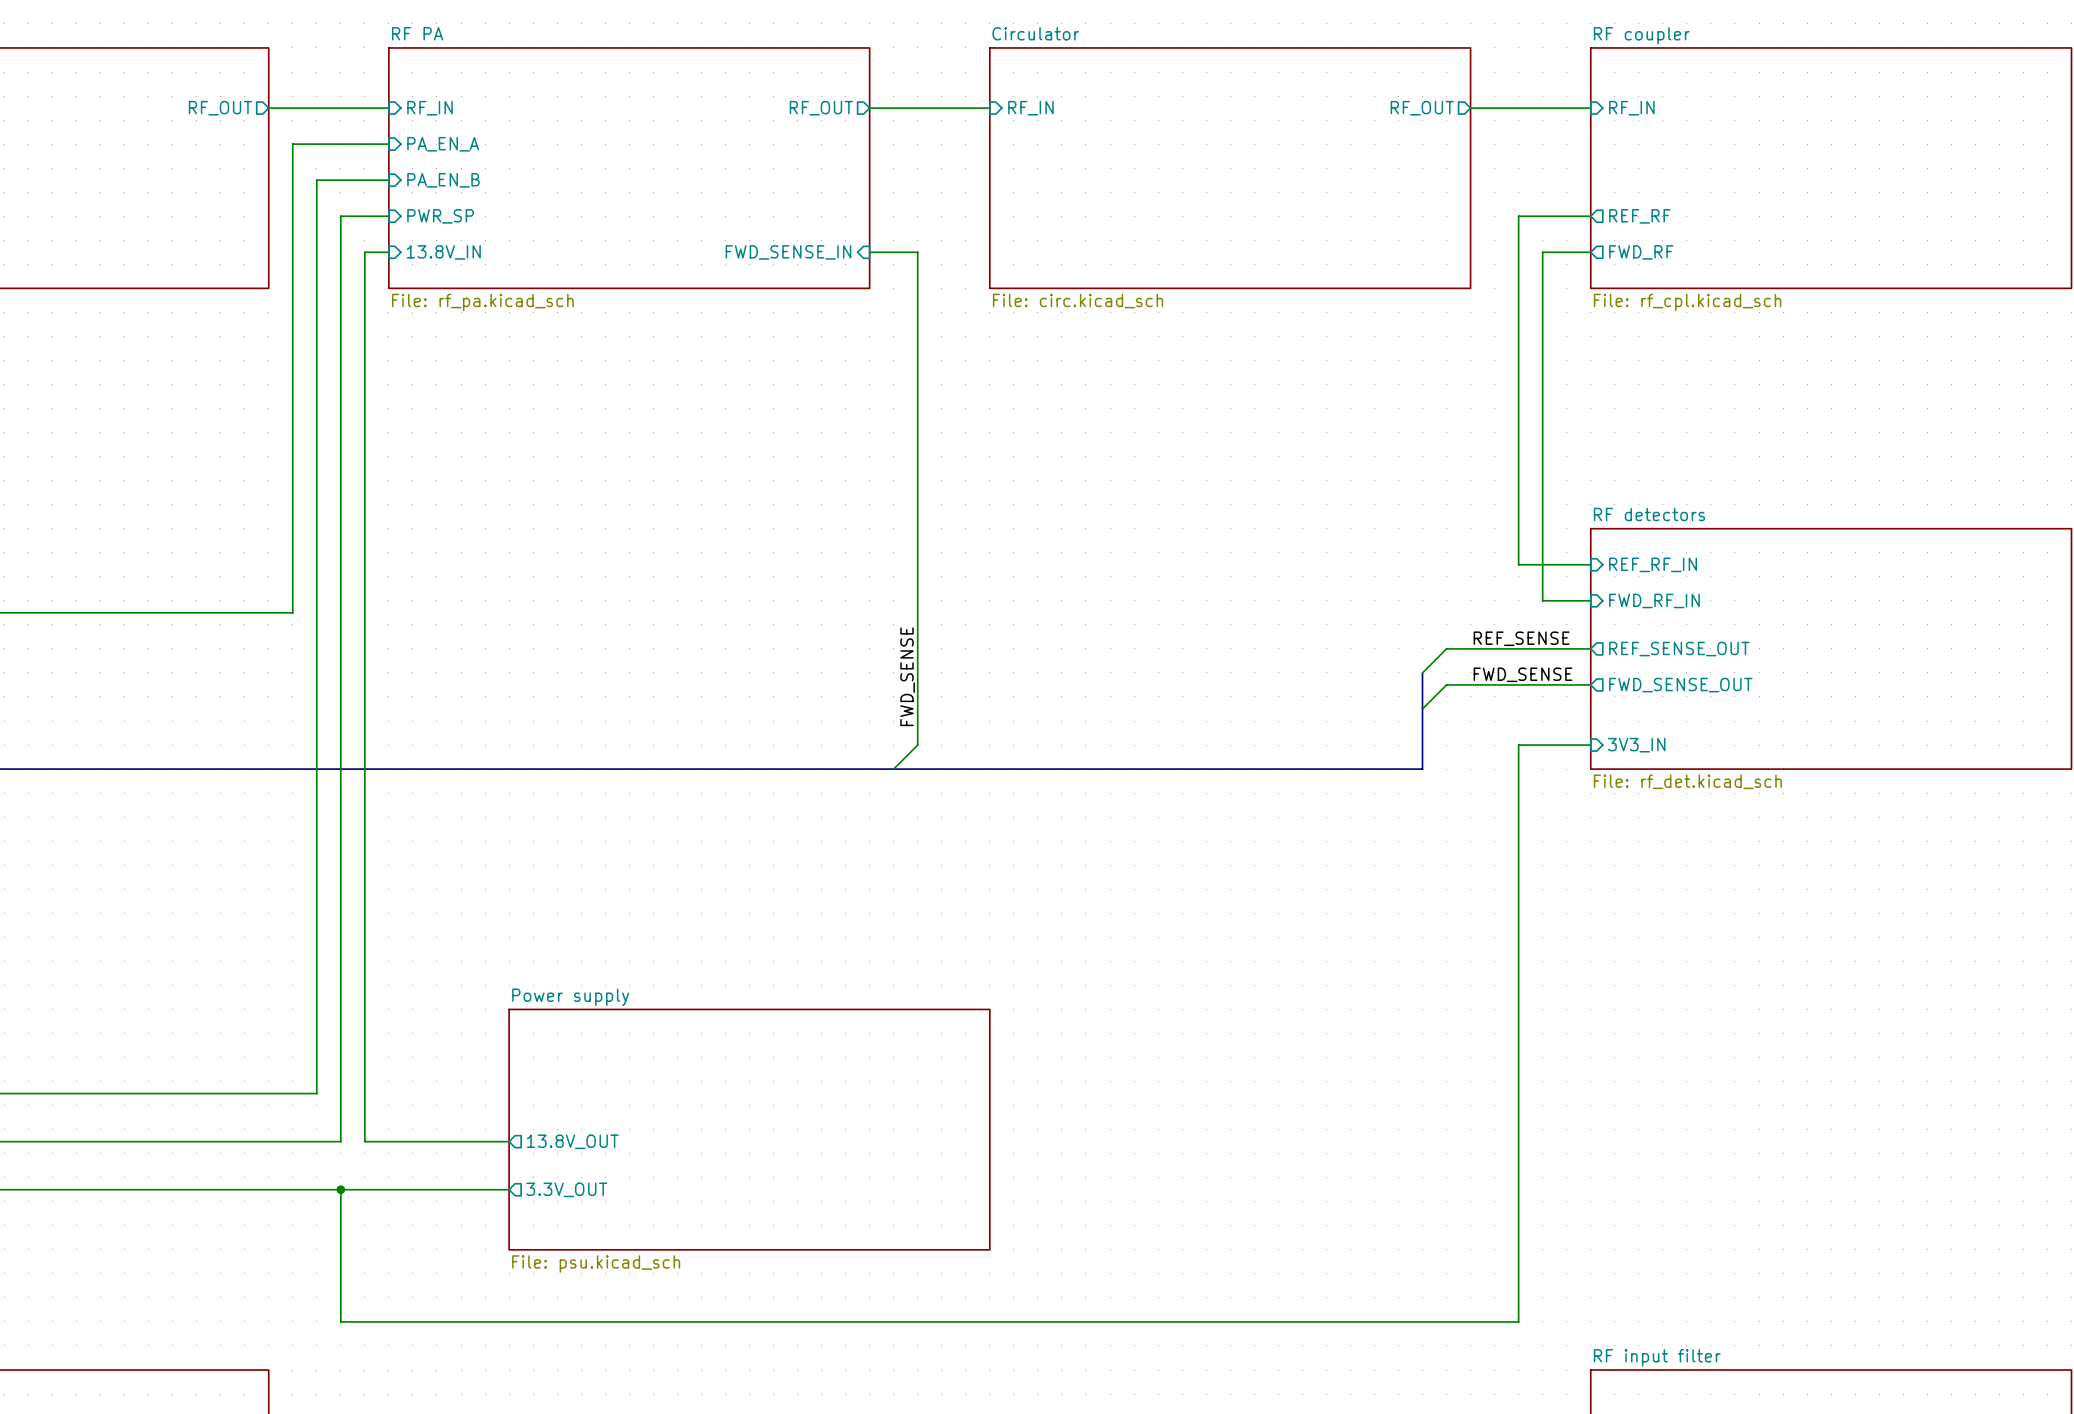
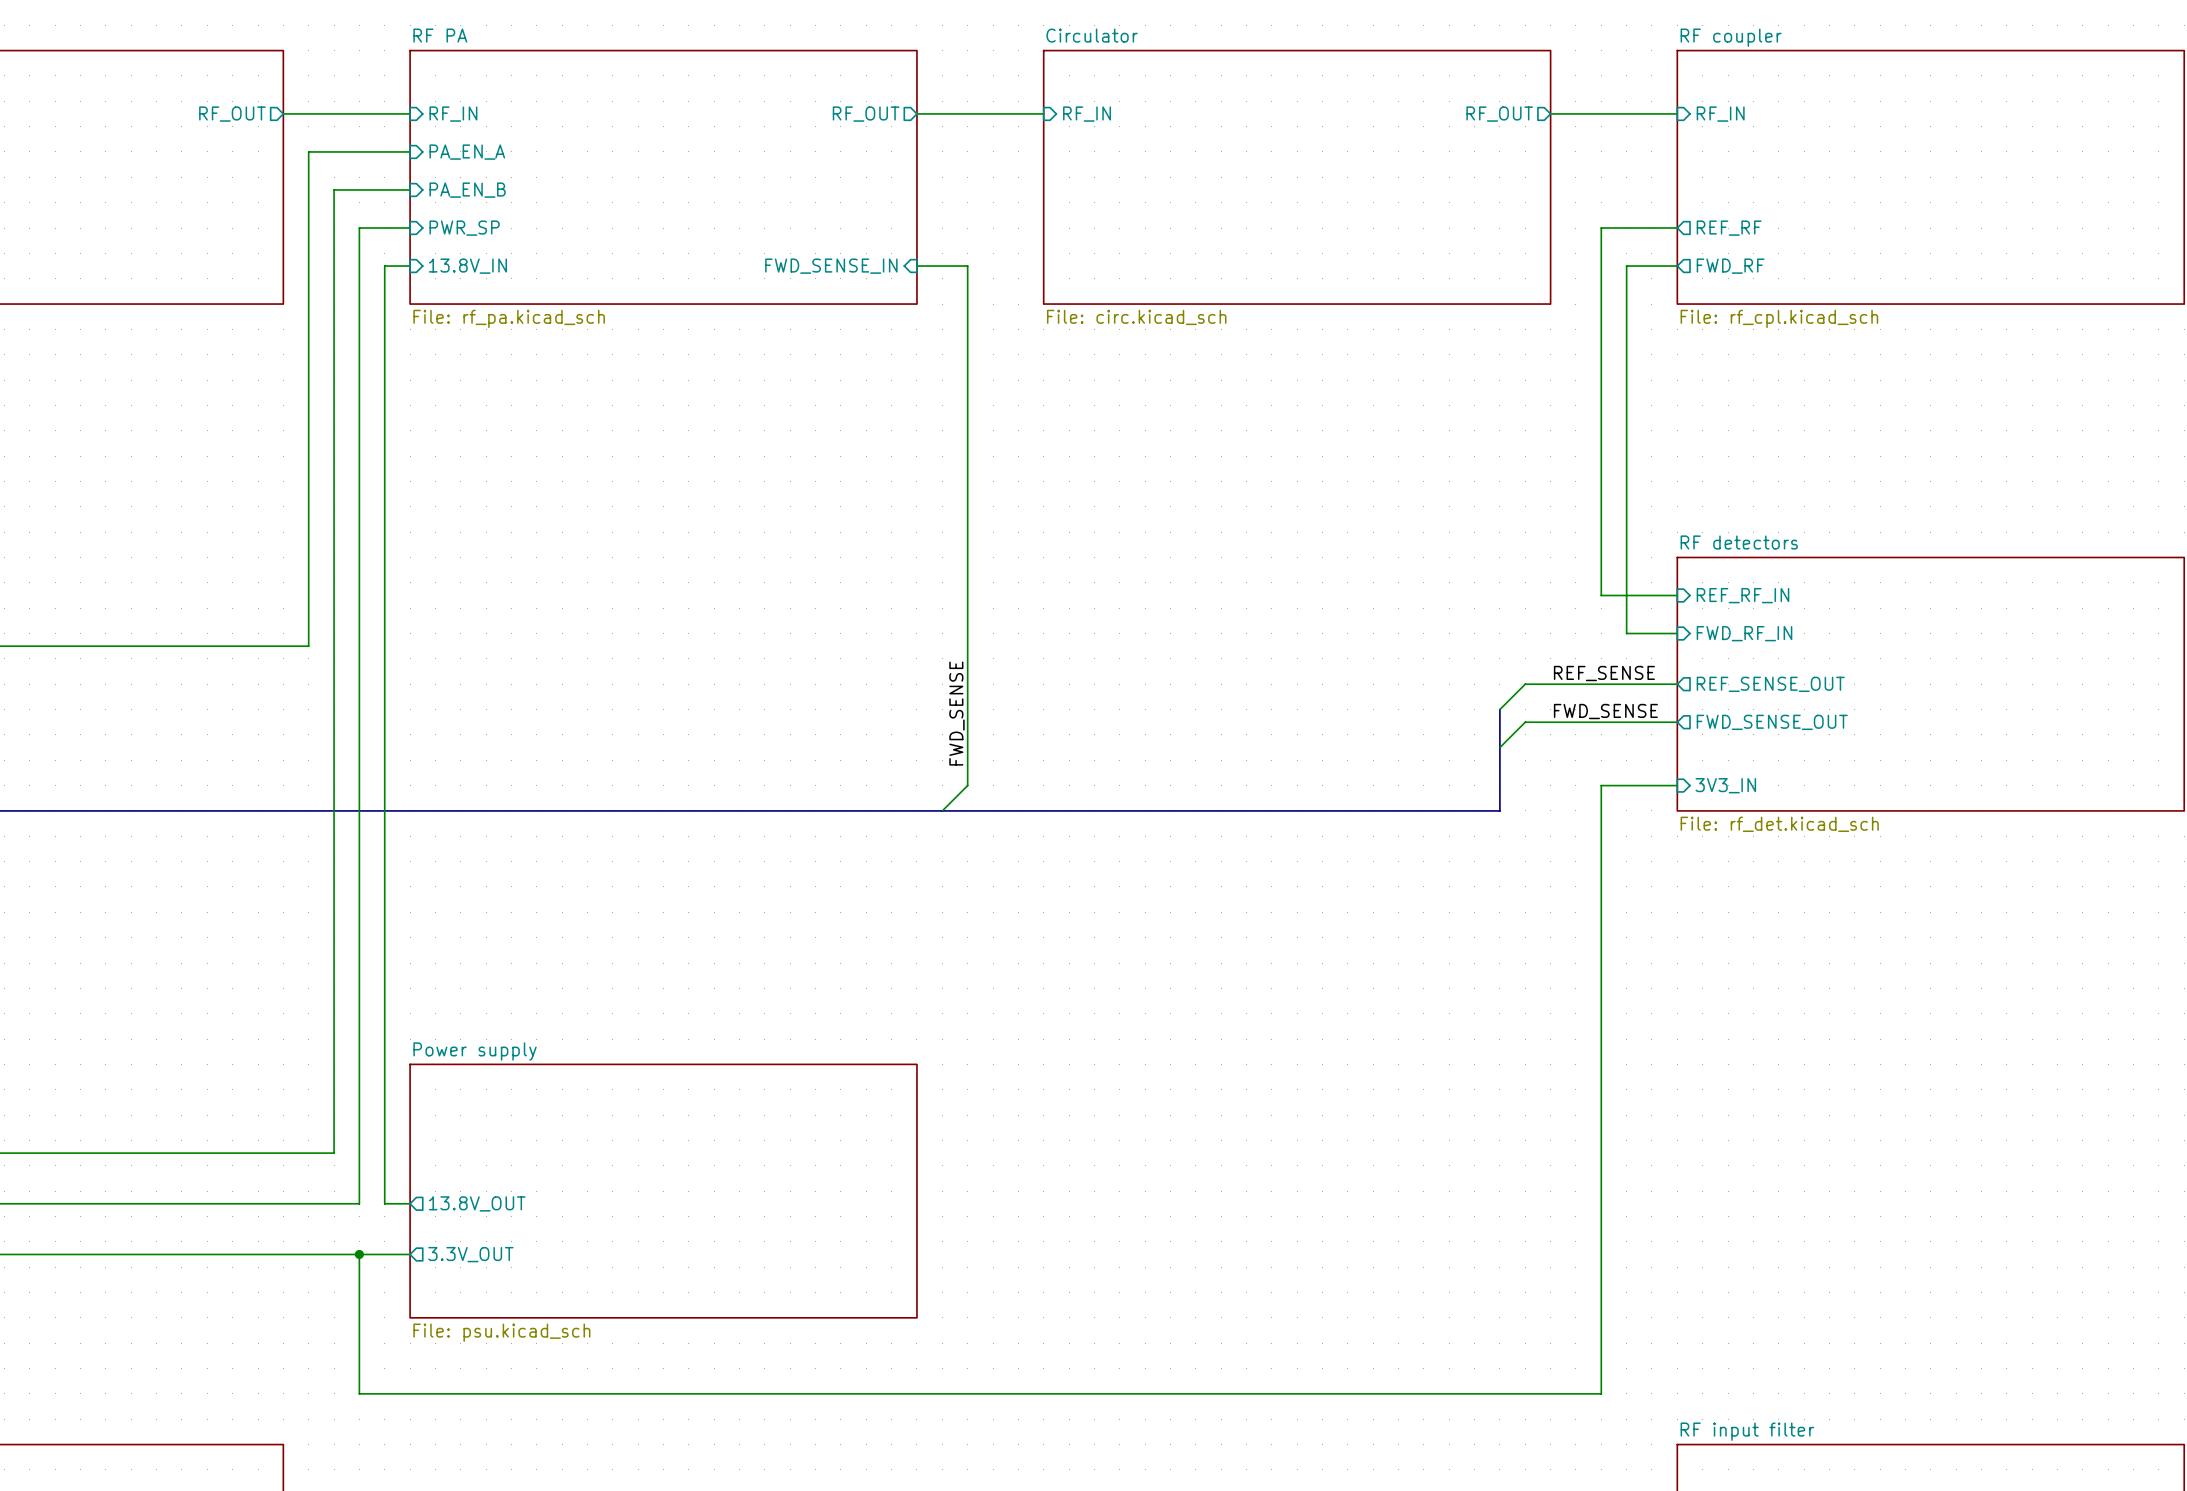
sheet Power supply position: (749, 1129) -> (663, 1191)
wire: (388, 1141) (509, 1141) -> none
sheet pin position: 13.8V_OUT (572, 1141) -> 13.8V_OUT (477, 1203)
wire: (388, 1189) (509, 1189) -> none
sheet pin position: 3.3V_OUT (566, 1189) -> 3.3V_OUT (470, 1254)

